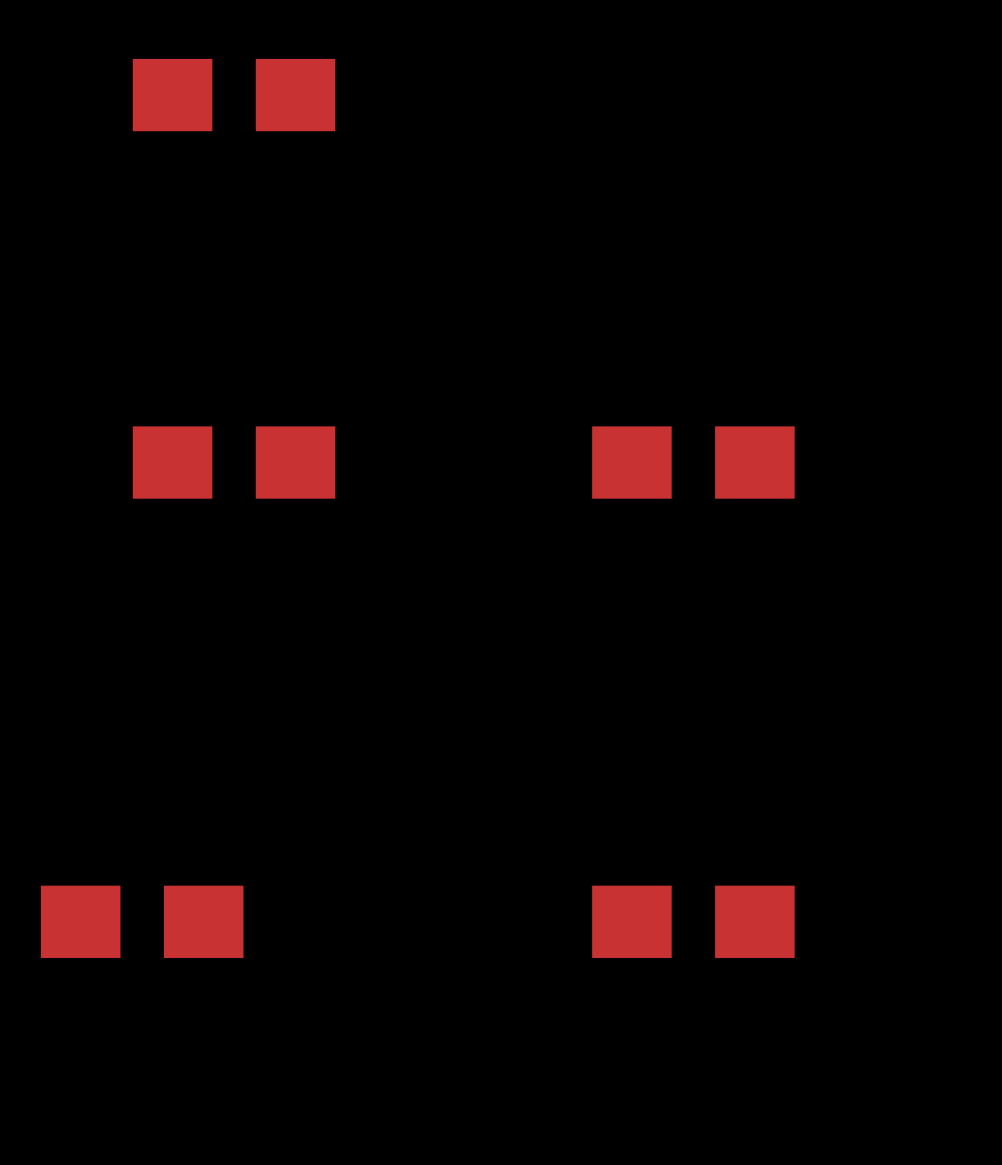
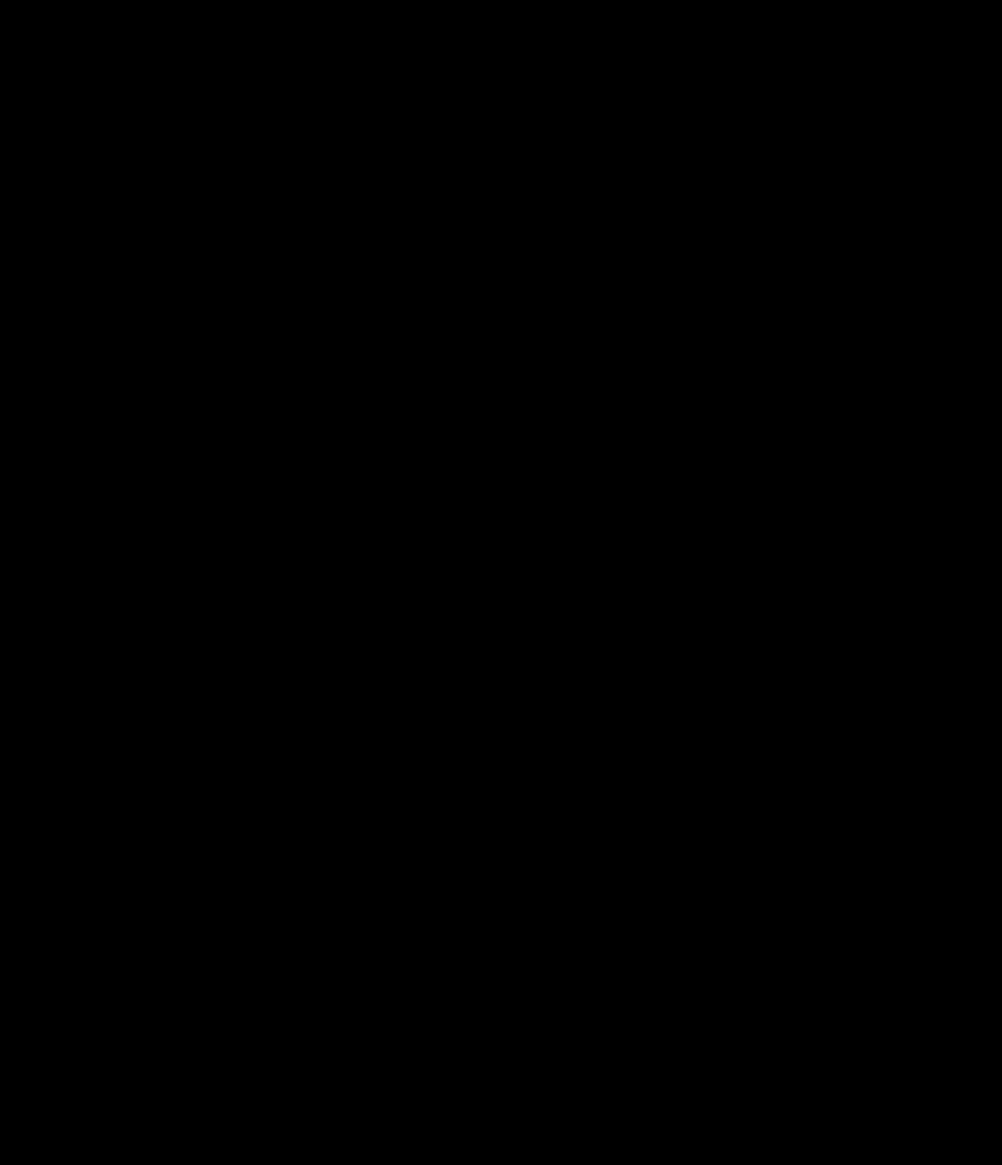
part: (234, 95) -> none
part: (234, 462) -> none
part: (693, 462) -> none
part: (142, 921) -> none
part: (693, 921) -> none

